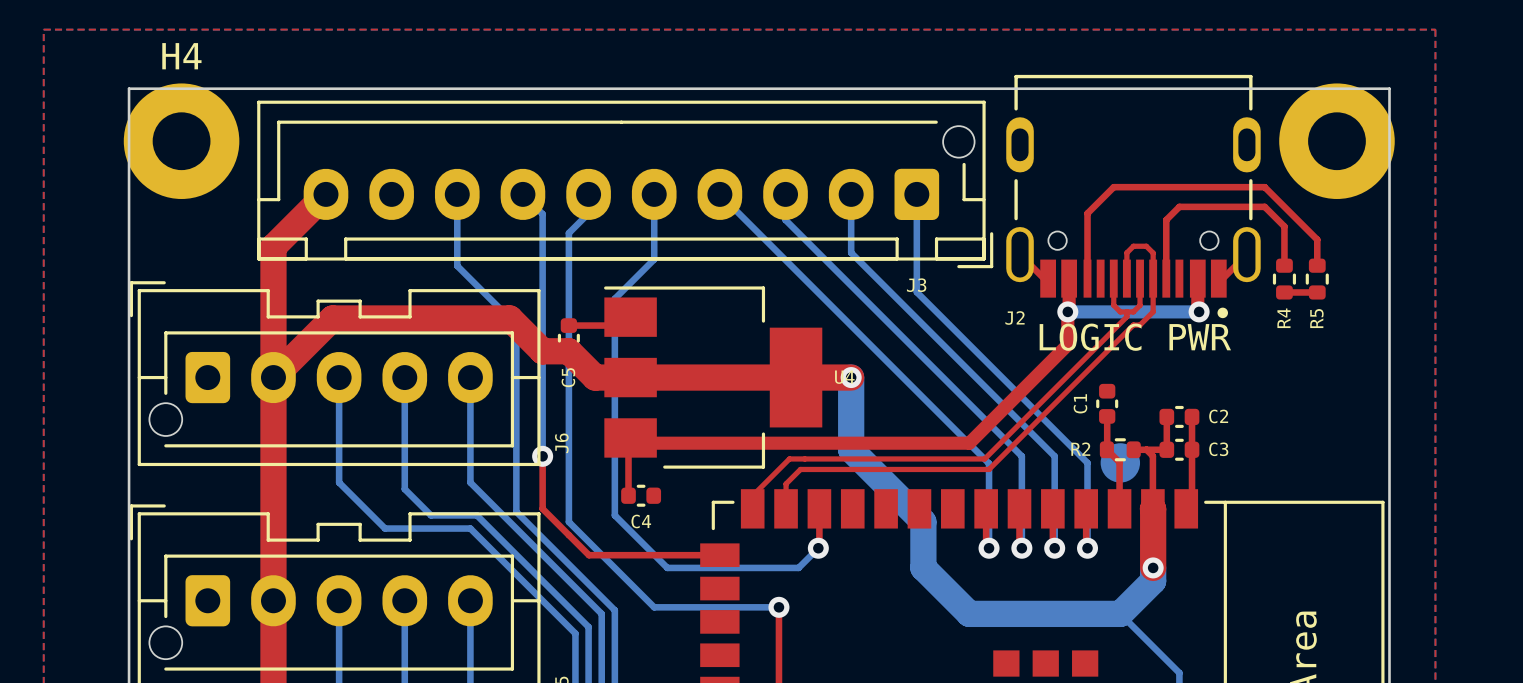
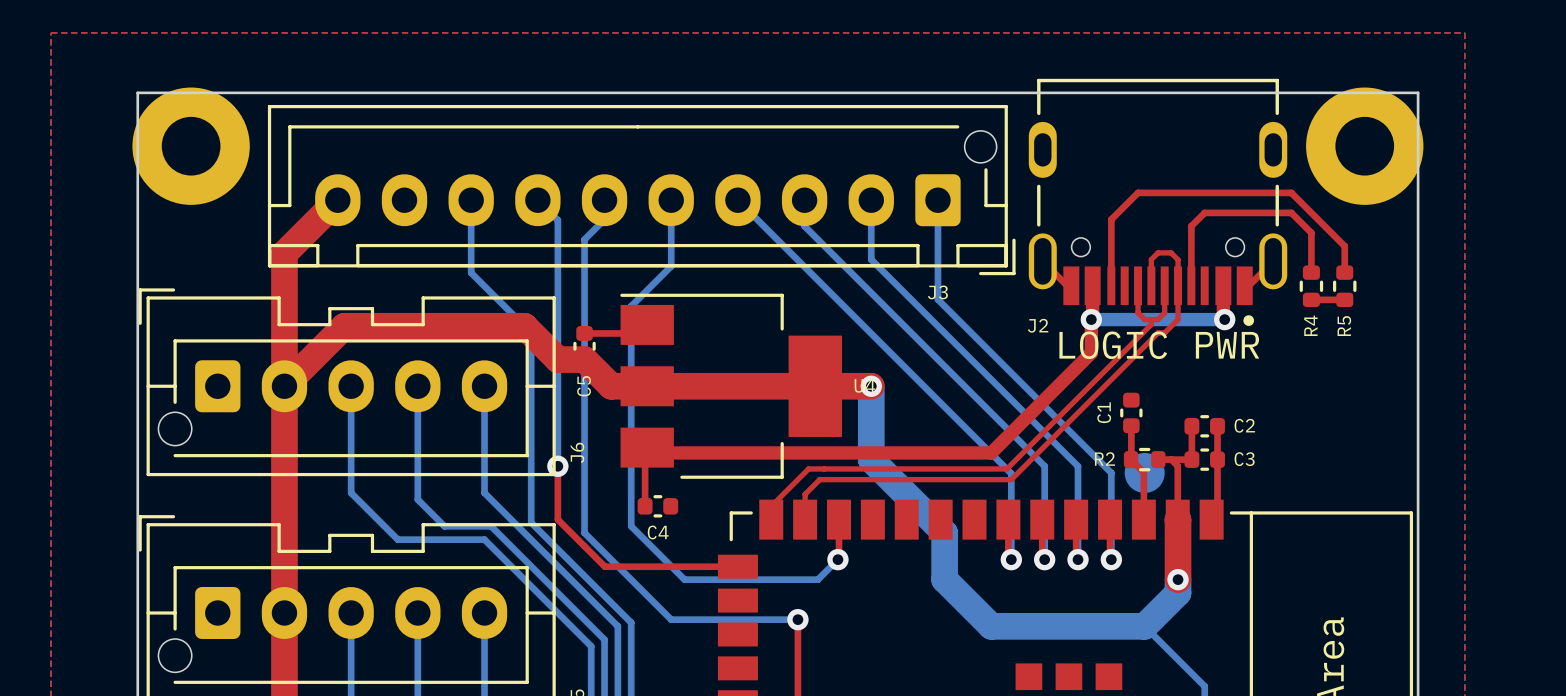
H4 name: H4 (181, 56) -> none

